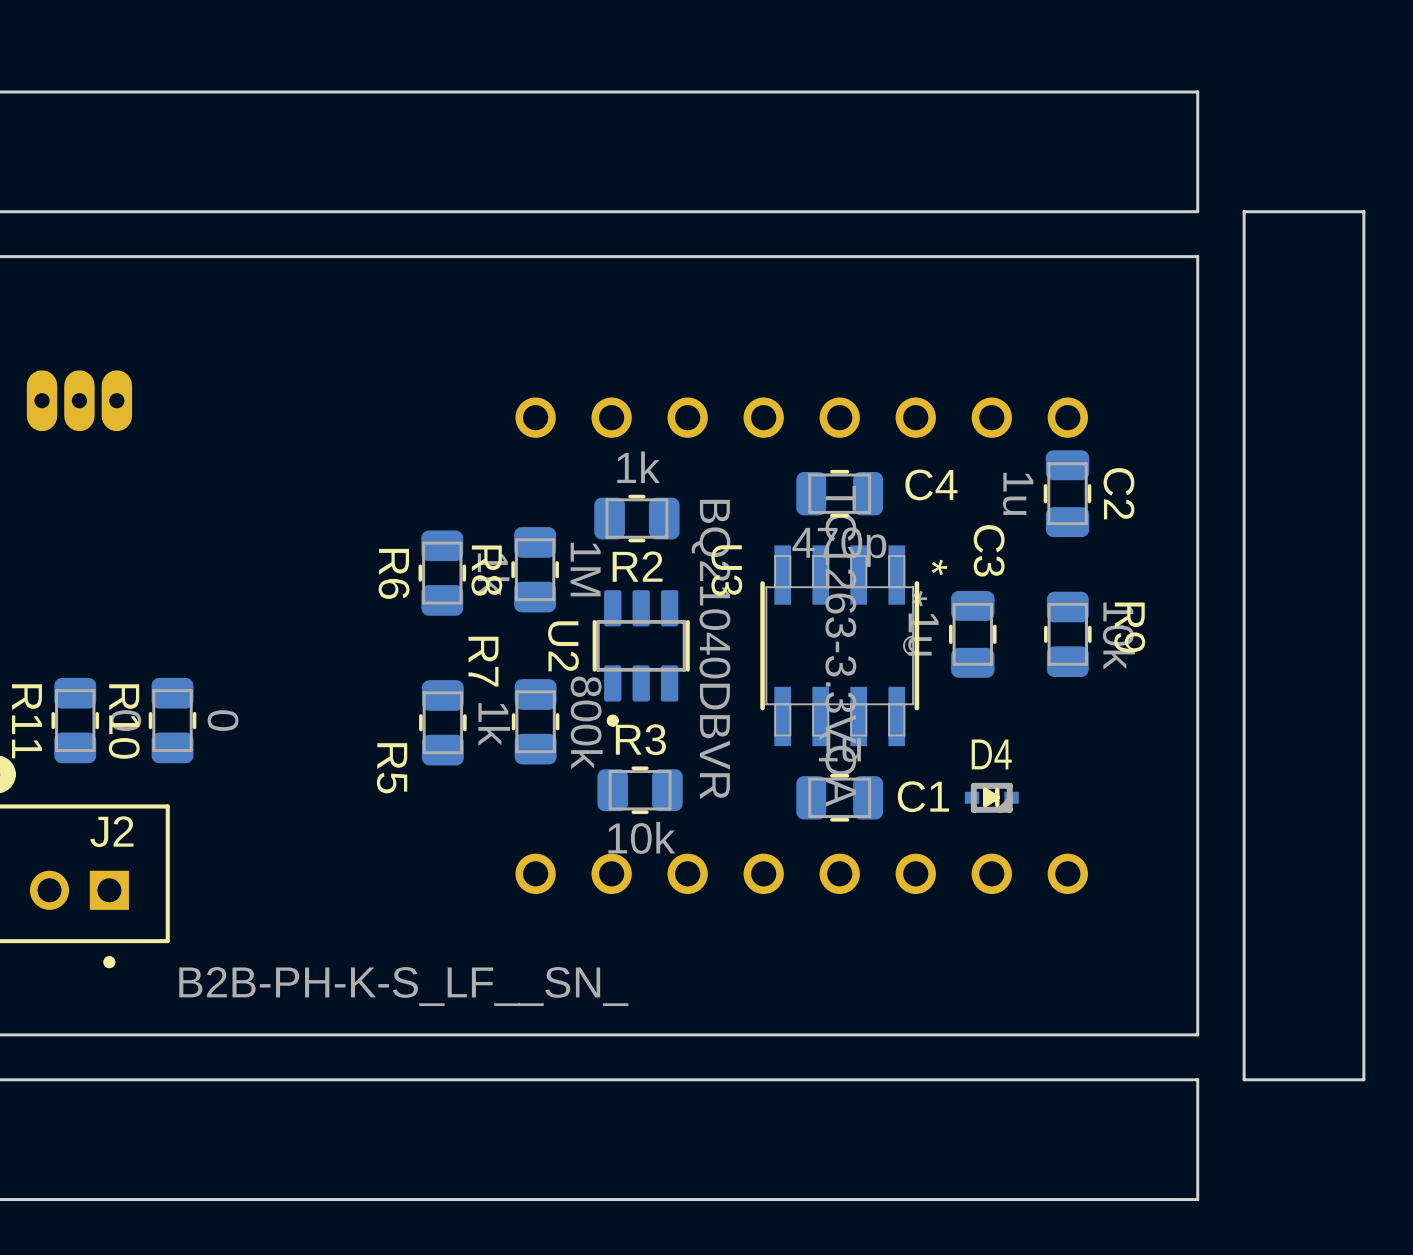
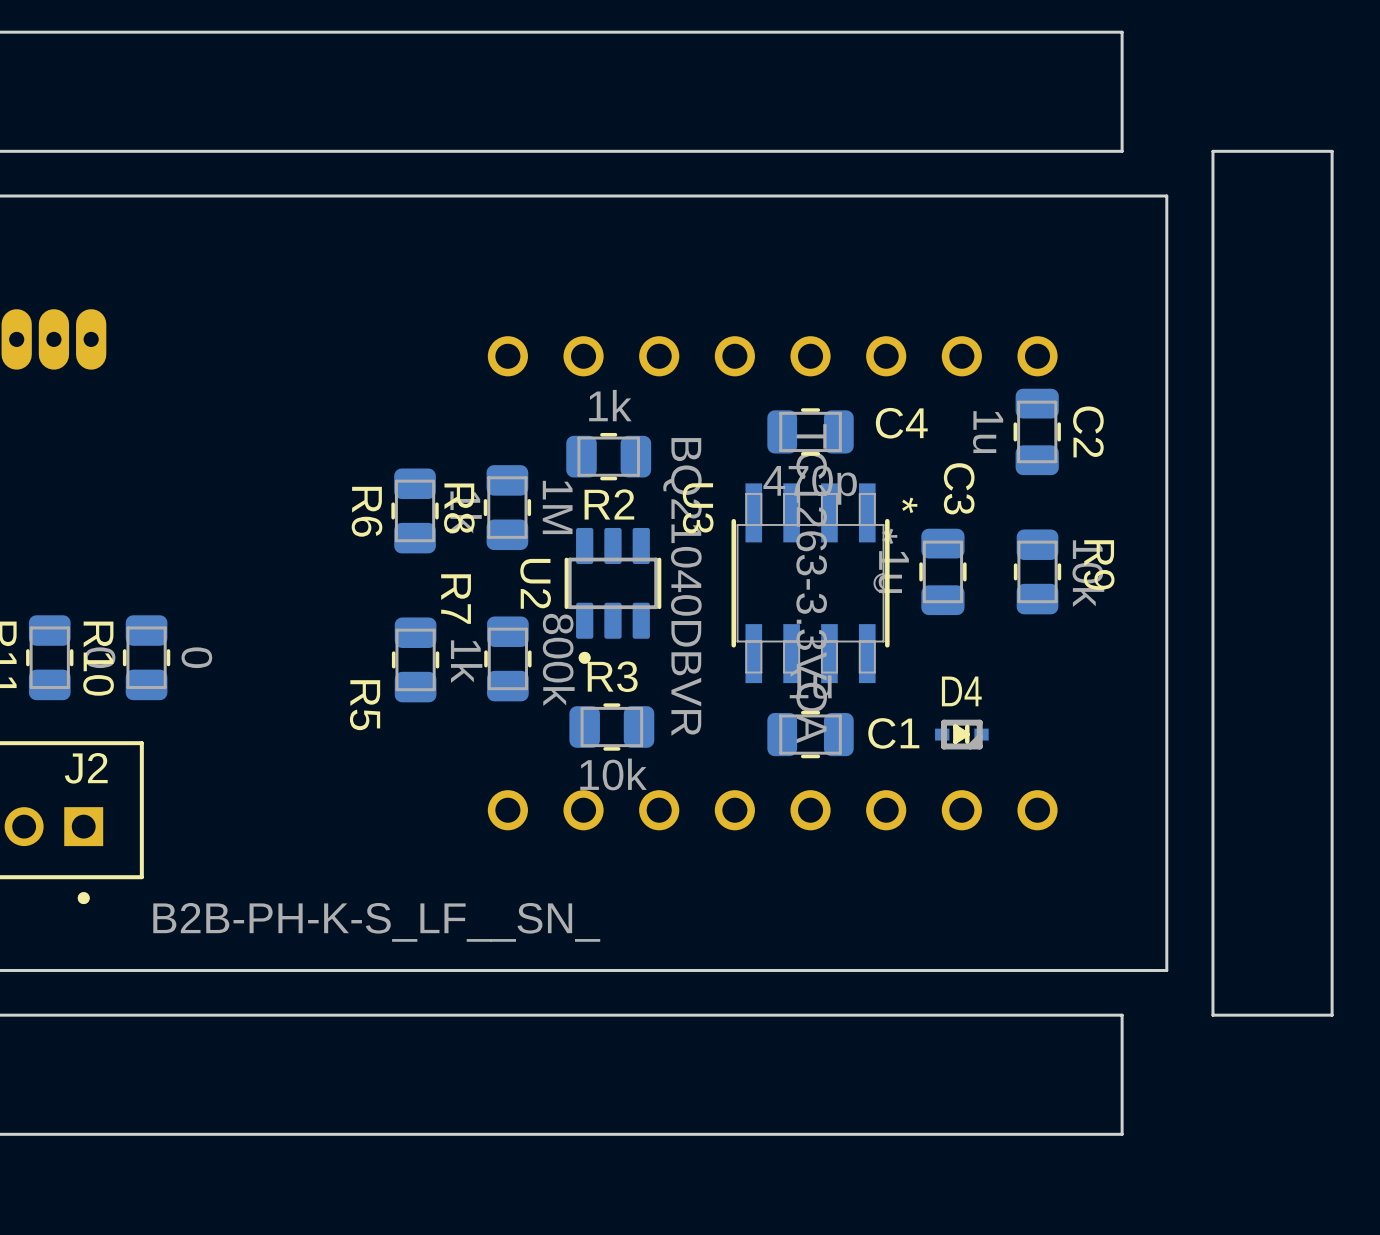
board edge: (1152, 91) (1197, 91) (1197, 211) (1152, 211) -> (1122, 32) (1122, 151)
board edge: (1152, 1079) (1197, 1079) (1197, 1199) (1152, 1199) -> (1122, 1015) (1122, 1134)

